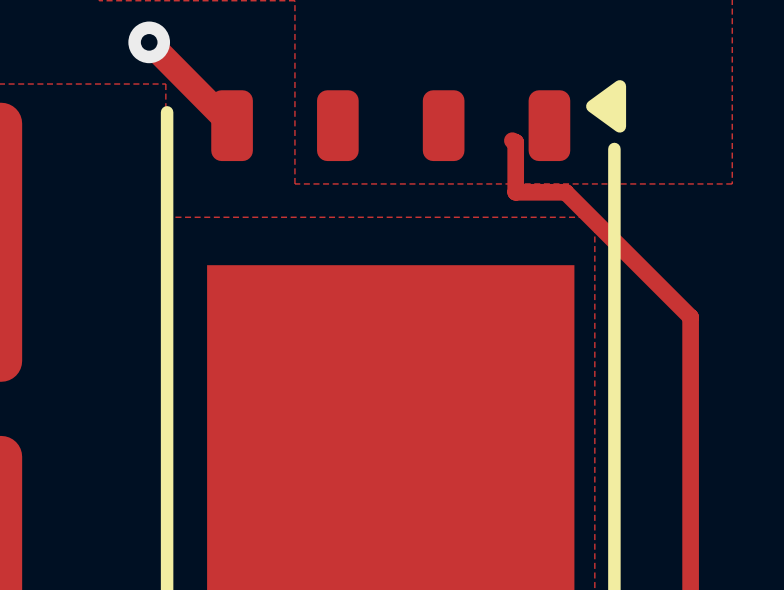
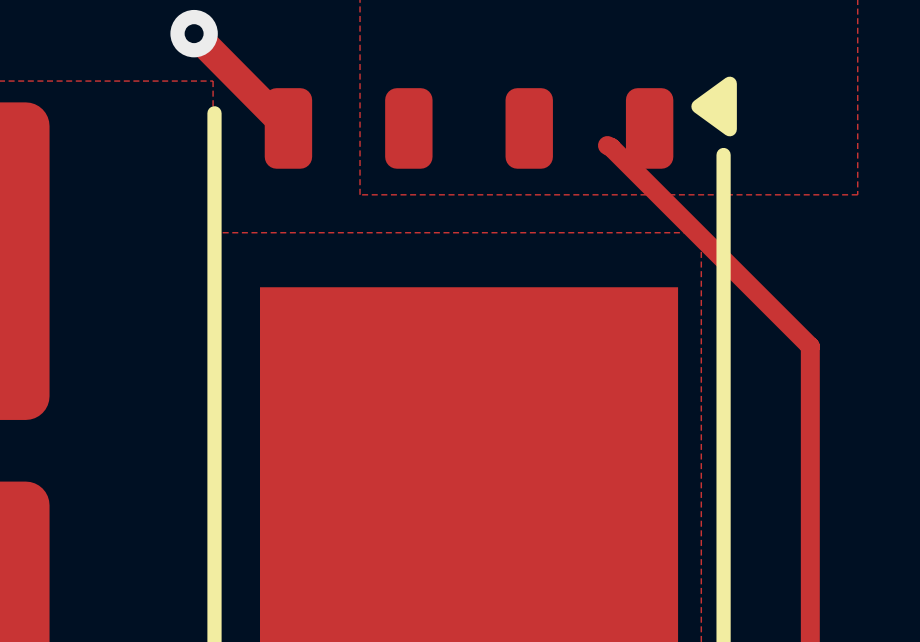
track: (515, 142) (515, 192) (565, 192) -> (611, 147) (668, 204)

